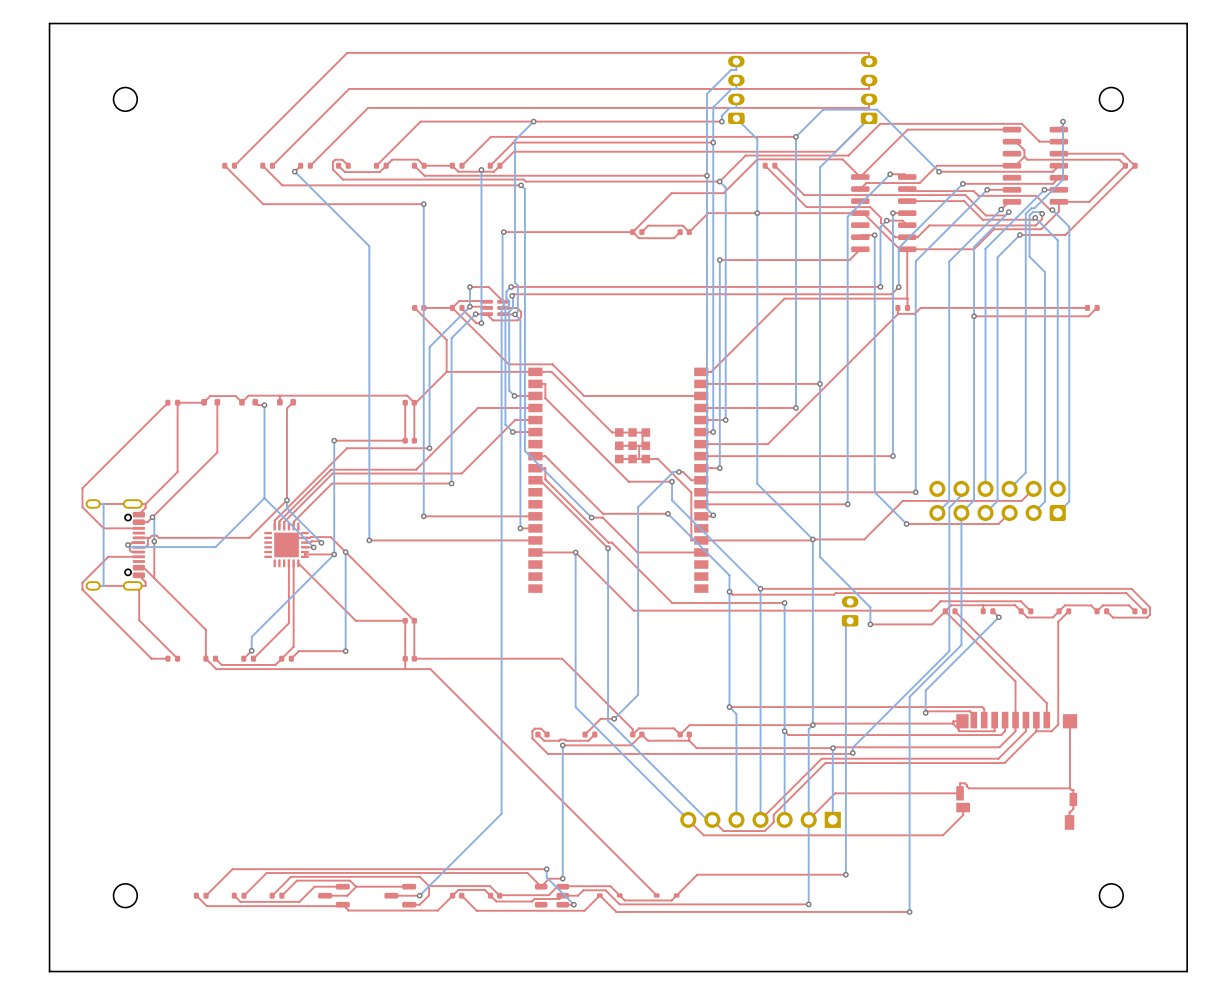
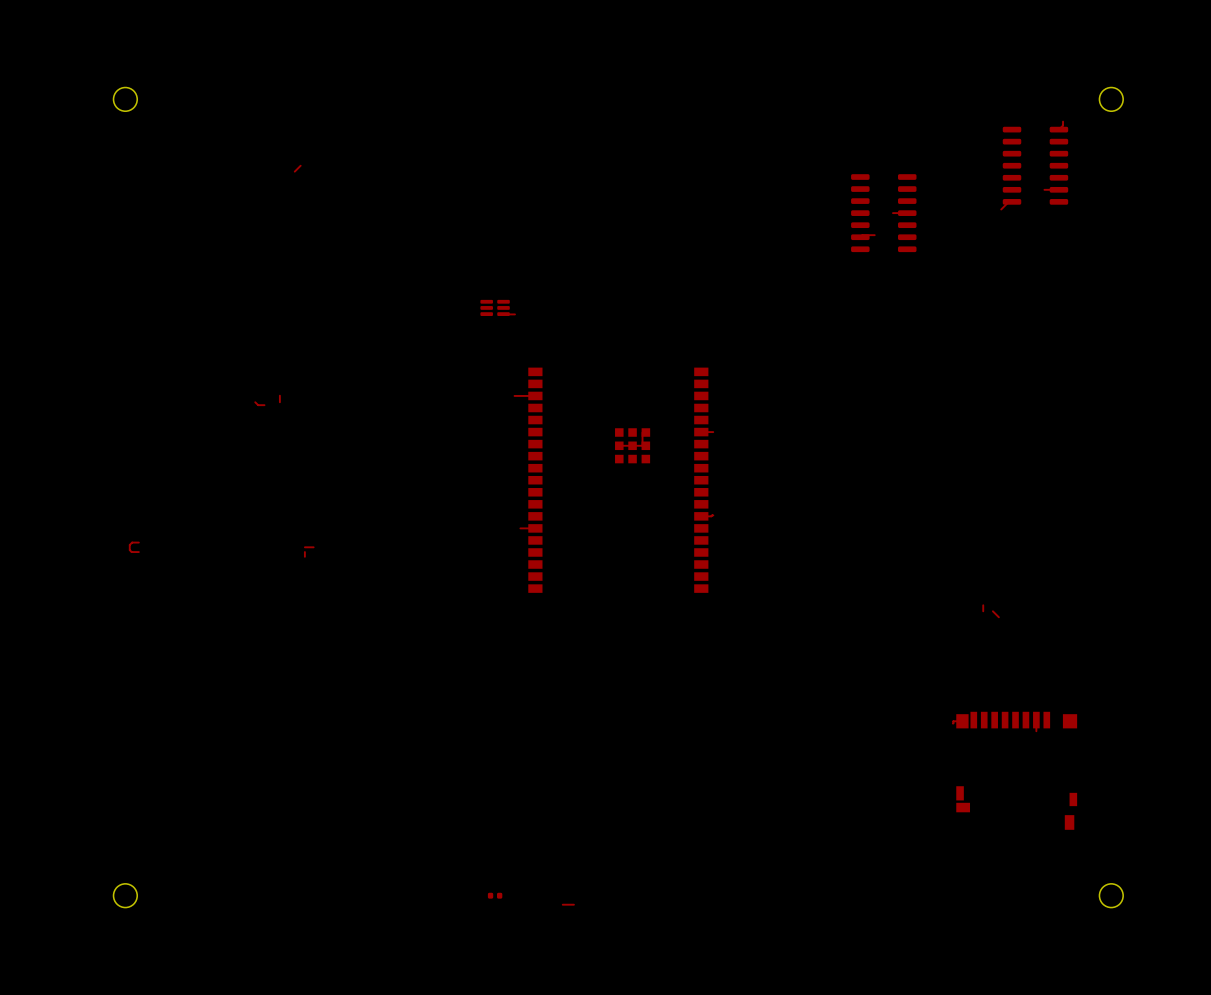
board edge: (1187, 23) (1187, 971) (49, 971) (49, 23) (1187, 23) -> none
bottom track: (736, 61) (736, 70) (731, 70) (706, 94) (706, 509) (713, 515) -> none
top track: (869, 61) (869, 52) (347, 52) (234, 165) -> none
bottom track: (736, 80) (736, 88) (731, 88) (713, 107) (713, 432) -> none
top track: (869, 80) (869, 88) (349, 88) (272, 165) -> none
part: (736, 89) -> none
part: (869, 89) -> none
bottom track: (736, 99) (736, 107) (729, 107) (721, 115) (721, 121) -> none
top track: (869, 99) (869, 107) (368, 107) (310, 165) -> none
bottom track: (736, 118) (757, 139) (757, 483) (812, 539) (812, 725) (808, 729) (808, 904) -> none
top track: (869, 118) (835, 151) (513, 151) (493, 171) (458, 171) (452, 165) (424, 165) (418, 159) (392, 159) (379, 172) (344, 172) (338, 165) -> none
bottom track: (869, 118) (820, 167) (820, 557) (870, 607) (870, 624) -> none
bottom track: (533, 121) (514, 140) (514, 282) (517, 285) (517, 311) (514, 314) (520, 319) (520, 528) -> none
via: (533, 121) -> none
top track: (721, 121) (420, 121) (376, 165) -> none
via: (721, 121) -> none
bottom track: (1063, 121) (1063, 179) (1034, 208) (1031, 208) (1025, 213) (1025, 472) (1009, 488) -> none
via: (1063, 121) -> none
top track: (1012, 129) (907, 129) (860, 177) (842, 159) (757, 159) (723, 193) (671, 193) (632, 232) -> none
top track: (796, 136) (490, 136) (462, 165) -> none
via: (796, 136) -> none
top track: (1012, 141) (1015, 141) (1024, 150) (1024, 156) -> none
top track: (1058, 141) (1039, 141) (1021, 123) (880, 123) (848, 155) (745, 155) (719, 181) (342, 179) (332, 169) (332, 161) (335, 159) (342, 159) (348, 165) -> none
top track: (713, 142) (513, 142) (490, 165) -> none
via: (713, 142) -> none
top track: (1058, 153) (1122, 153) (1134, 165) -> none
top track: (1024, 156) (1027, 159) (1119, 159) (1125, 165) (1089, 201) (1058, 201) (1058, 211) (1041, 229) (994, 229) (974, 249) (899, 249) (863, 213) (708, 213) (689, 232) (682, 225) (648, 225) (641, 232) -> none
top track: (1024, 156) (1015, 165) (936, 165) (919, 183) (866, 183) (860, 189) -> none
top track: (224, 165) (263, 204) (423, 204) -> none
part: (229, 165) -> none
top track: (262, 165) (282, 185) (521, 185) -> none
part: (267, 165) -> none
part: (305, 165) -> none
part: (343, 165) -> none
part: (381, 165) -> none
top track: (414, 165) (424, 175) (706, 175) -> none
part: (419, 165) -> none
part: (457, 165) -> none
part: (495, 165) -> none
top track: (765, 165) (806, 207) (870, 207) (881, 217) (881, 223) (895, 237) (917, 237) (929, 225) (1035, 225) (1042, 219) (1042, 213) -> none
part: (770, 165) -> none
top track: (774, 165) (804, 195) (965, 195) (985, 215) (1005, 215) (1008, 212) -> none
top track: (1058, 165) (1052, 171) (939, 171) -> none
part: (1130, 165) -> none
top track: (1134, 165) (1065, 234) (1019, 234) -> none
bottom track: (481, 169) (481, 323) -> none
via: (481, 169) -> none
bottom track: (294, 171) (369, 246) (369, 540) -> none
via: (294, 171) -> none
bottom track: (939, 171) (877, 109) (823, 109) (796, 136) (796, 408) -> none
via: (939, 171) -> none
top track: (890, 174) (904, 174) (907, 177) -> none
bottom track: (890, 174) (847, 216) (847, 504) -> none
via: (890, 174) -> none
via: (706, 175) -> none
top track: (1058, 177) (1052, 183) (962, 183) -> none
bottom track: (719, 181) (725, 187) (725, 420) -> none
via: (719, 181) -> none
bottom track: (962, 183) (898, 247) (898, 287) -> none
via: (962, 183) -> none
bottom track: (521, 185) (524, 189) (524, 450) (591, 517) -> none
via: (521, 185) -> none
top track: (907, 189) (909, 191) (973, 191) (978, 195) (1036, 195) (1052, 209) -> none
bottom track: (987, 189) (915, 261) (915, 492) -> none
via: (987, 189) -> none
top track: (1012, 189) (987, 189) -> none
bottom track: (1044, 189) (985, 248) (985, 488) -> none
via: (1044, 189) -> none
top track: (907, 201) (964, 201) (982, 219) (1033, 219) (1035, 217) -> none
bottom track: (423, 204) (423, 516) -> none
via: (423, 204) -> none
bottom track: (1001, 209) (949, 261) (949, 501) (937, 512) -> none
via: (1001, 209) -> none
bottom track: (1052, 209) (1069, 226) (1069, 501) (1057, 512) -> none
via: (1052, 209) -> none
bottom track: (1008, 212) (974, 246) (974, 500) (961, 512) (961, 645) (909, 696) (909, 911) -> none
via: (1008, 212) -> none
via: (757, 213) -> none
bottom track: (892, 213) (892, 456) -> none
via: (892, 213) -> none
bottom track: (1042, 213) (1032, 212) (1029, 215) (1029, 256) (1044, 272) (1044, 501) (1033, 512) -> none
via: (1042, 213) -> none
bottom track: (1035, 217) (1057, 240) (1057, 488) -> none
via: (1035, 217) -> none
top track: (886, 220) (902, 220) (907, 225) -> none
bottom track: (886, 220) (880, 226) (880, 286) -> none
via: (886, 220) -> none
bottom track: (503, 232) (503, 305) (501, 307) (501, 813) (419, 895) -> none
via: (503, 232) -> none
top track: (632, 232) (503, 232) -> none
part: (637, 232) -> none
top track: (680, 232) (674, 238) (638, 238) (632, 232) -> none
part: (684, 232) -> none
bottom track: (1019, 234) (997, 257) (997, 500) (985, 512) -> none
via: (1019, 234) -> none
bottom track: (874, 235) (874, 492) (906, 524) -> none
via: (874, 235) -> none
top track: (860, 249) (849, 260) (719, 260) -> none
top track: (907, 249) (907, 298) -> none
bottom track: (719, 260) (719, 468) -> none
via: (719, 260) -> none
bottom track: (511, 286) (506, 291) (509, 305) (505, 309) (505, 424) (512, 432) -> none
via: (511, 286) -> none
top track: (880, 286) (511, 286) -> none
via: (880, 286) -> none
top track: (469, 287) (488, 287) (503, 301) -> none
bottom track: (469, 287) (469, 306) (429, 347) (429, 448) -> none
via: (469, 287) -> none
top track: (898, 287) (891, 294) (513, 294) (512, 295) -> none
via: (898, 287) -> none
bottom track: (512, 295) (513, 307) (509, 311) (509, 390) (514, 395) -> none
via: (512, 295) -> none
top track: (907, 298) (784, 298) (711, 371) (701, 371) -> none
top track: (907, 298) (907, 307) -> none
top track: (486, 301) (459, 301) (452, 307) -> none
top track: (469, 306) (486, 307) -> none
via: (469, 306) -> none
top track: (414, 307) (446, 339) (446, 371) -> none
part: (419, 307) -> none
top track: (452, 307) (423, 307) -> none
top track: (452, 307) (508, 364) (552, 364) (584, 395) (701, 395) -> none
part: (457, 307) -> none
top track: (462, 307) (476, 323) (481, 323) -> none
top track: (503, 307) (517, 307) (521, 311) (521, 317) (517, 320) (492, 320) (486, 314) (475, 314) -> none
top track: (897, 307) (897, 314) (767, 444) (701, 444) -> none
part: (902, 307) -> none
top track: (1087, 307) (920, 307) (914, 313) (897, 313) -> none
part: (1092, 307) -> none
top track: (1097, 307) (1088, 316) (974, 316) -> none
bottom track: (475, 314) (451, 338) (451, 483) -> none
via: (475, 314) -> none
via: (514, 314) -> none
via: (974, 316) -> none
via: (481, 323) -> none
top track: (446, 371) (551, 371) (612, 432) (645, 432) -> none
top track: (446, 371) (414, 402) -> none
top track: (535, 383) (545, 383) (545, 398) (628, 481) (672, 481) -> none
top track: (820, 383) (701, 383) -> none
via: (820, 383) -> none
via: (514, 395) -> none
top track: (167, 402) (82, 488) (82, 507) (103, 528) (138, 528) -> none
part: (172, 402) -> none
part: (210, 402) -> none
top track: (217, 402) (217, 452) (147, 522) (138, 522) -> none
part: (248, 402) -> none
part: (286, 402) -> none
top track: (293, 402) (286, 408) (286, 500) (249, 537) (158, 537) (156, 535) (138, 537) -> none
top track: (405, 402) (405, 440) (334, 440) -> none
part: (409, 402) -> none
top track: (414, 402) (414, 440) -> none
top track: (414, 402) (407, 395) (248, 395) (241, 402) (235, 396) (210, 396) (203, 402) (177, 402) (177, 471) (145, 503) -> none
bottom track: (264, 405) (264, 498) (215, 547) (130, 547) (127, 544) -> none
via: (264, 405) -> none
top track: (535, 408) (477, 408) (416, 469) (331, 469) (279, 521) (279, 526) -> none
top track: (796, 408) (701, 408) -> none
via: (796, 408) -> none
top track: (535, 420) (515, 420) (461, 473) (332, 473) (284, 522) (284, 526) -> none
top track: (725, 420) (701, 420) -> none
via: (725, 420) -> none
via: (512, 432) -> none
top track: (535, 432) (512, 432) -> none
via: (713, 432) -> none
bottom track: (334, 440) (334, 554) (251, 636) (251, 650) -> none
via: (334, 440) -> none
part: (409, 440) -> none
top track: (639, 445) (639, 459) -> none
top track: (429, 448) (347, 448) (274, 520) (274, 526) -> none
via: (429, 448) -> none
top track: (535, 456) (545, 456) (603, 513) (667, 513) -> none
top track: (892, 456) (701, 456) -> none
via: (892, 456) -> none
top track: (619, 459) (657, 459) (691, 492) (691, 540) (864, 539) (902, 500) (1021, 500) (1033, 488) -> none
top track: (535, 468) (545, 468) (545, 479) (672, 602) (784, 602) -> none
top track: (719, 468) (701, 468) -> none
via: (719, 468) -> none
top track: (678, 471) (683, 471) (691, 480) (701, 480) -> none
bottom track: (678, 471) (673, 471) (638, 507) (638, 694) (614, 718) -> none
via: (678, 471) -> none
top track: (535, 480) (539, 480) (608, 548) -> none
bottom track: (672, 481) (672, 500) (760, 588) (760, 819) -> none
via: (672, 481) -> none
top track: (451, 483) (332, 483) (293, 521) (293, 526) -> none
via: (451, 483) -> none
bottom track: (961, 488) (961, 495) (949, 507) (949, 651) (852, 747) (852, 752) -> none
top track: (915, 492) (701, 492) -> none
via: (915, 492) -> none
bottom track: (264, 498) (313, 547) -> none
bottom track: (286, 500) (286, 508) (321, 542) -> none
via: (286, 500) -> none
part: (997, 500) -> none
bottom track: (93, 503) (103, 503) (103, 585) (93, 585) -> none
top track: (145, 503) (145, 507) (138, 514) -> none
top track: (145, 503) (93, 503) -> none
top track: (847, 504) (701, 504) -> none
via: (847, 504) -> none
top track: (1009, 512) (998, 524) (906, 524) -> none
bottom track: (667, 513) (729, 575) (729, 707) (736, 714) (736, 819) -> none
via: (667, 513) -> none
via: (713, 515) -> none
via: (423, 516) -> none
top track: (535, 516) (423, 516) -> none
bottom track: (152, 517) (154, 519) (154, 541) -> none
via: (152, 517) -> none
top track: (591, 517) (602, 517) (637, 552) (701, 552) -> none
via: (591, 517) -> none
via: (906, 524) -> none
via: (520, 528) -> none
top track: (147, 537) (147, 544) (145, 547) (138, 547) -> none
via: (812, 539) -> none
via: (369, 540) -> none
top track: (535, 540) (369, 540) -> none
top track: (154, 541) (154, 578) -> none
via: (154, 541) -> none
top track: (304, 542) (319, 541) (321, 542) -> none
via: (321, 542) -> none
part: (115, 544) -> none
via: (127, 544) -> none
top track: (286, 544) (293, 537) (330, 537) (414, 620) (414, 658) (562, 658) (632, 729) (632, 734) (638, 728) (674, 728) (680, 734) (689, 725) (812, 725) (814, 723) (953, 723) (959, 731) (994, 731) (994, 720) -> none
part: (286, 544) -> none
via: (313, 547) -> none
bottom track: (608, 548) (608, 720) (707, 819) (712, 819) -> none
via: (608, 548) -> none
bottom track: (345, 552) (345, 651) -> none
via: (345, 552) -> none
top track: (535, 552) (575, 552) (633, 610) (931, 610) (940, 601) (1020, 601) (1030, 611) -> none
bottom track: (575, 552) (575, 707) (688, 819) -> none
via: (575, 552) -> none
top track: (334, 554) (304, 554) -> none
via: (334, 554) -> none
top track: (138, 556) (108, 556) (82, 582) (82, 589) (151, 658) (167, 658) -> none
top track: (288, 563) (288, 623) (253, 658) -> none
top track: (293, 563) (293, 646) (275, 664) (221, 664) (215, 658) -> none
top track: (298, 563) (355, 620) (405, 620) (405, 669) -> none
top track: (138, 567) (143, 567) (205, 629) (205, 658) (216, 669) (430, 669) (656, 895) -> none
top track: (138, 575) (145, 582) (145, 585) (93, 585) -> none
top track: (139, 585) (139, 620) (177, 658) -> none
top track: (760, 588) (1131, 588) (1150, 607) (1150, 614) (1147, 617) (1112, 617) (1106, 611) -> none
via: (760, 588) -> none
top track: (729, 591) (732, 594) (1126, 593) (1144, 611) -> none
via: (729, 591) -> none
bottom track: (784, 602) (784, 819) -> none
via: (784, 602) -> none
part: (850, 611) -> none
top track: (945, 611) (1015, 681) (1015, 731) (999, 747) (696, 748) (689, 740) -> none
part: (950, 611) -> none
top track: (954, 611) (1046, 703) (1046, 720) -> none
part: (988, 611) -> none
part: (1025, 611) -> none
part: (1063, 611) -> none
top track: (1068, 611) (1058, 621) (1058, 724) (1051, 731) (1036, 731) (1004, 763) (825, 763) (773, 814) (773, 822) (764, 831) (723, 831) (712, 819) -> none
part: (1101, 611) -> none
top track: (1134, 611) (1128, 605) (1102, 605) (1096, 611) (1091, 605) (1064, 605) (1052, 617) (1027, 617) (1015, 605) (951, 605) (932, 624) (870, 624) -> none
part: (1139, 611) -> none
bottom track: (998, 617) (925, 690) (925, 712) -> none
via: (998, 617) -> none
part: (409, 620) -> none
bottom track: (850, 620) (845, 625) (845, 874) -> none
via: (870, 624) -> none
top track: (251, 650) (243, 658) -> none
via: (251, 650) -> none
top track: (345, 651) (298, 651) (291, 658) -> none
via: (345, 651) -> none
part: (172, 658) -> none
part: (210, 658) -> none
part: (248, 658) -> none
part: (286, 658) -> none
part: (409, 658) -> none
top track: (729, 707) (982, 707) (984, 708) (984, 720) -> none
via: (729, 707) -> none
top track: (925, 712) (927, 711) (969, 711) (973, 715) (973, 720) -> none
via: (925, 712) -> none
top track: (614, 718) (600, 718) (585, 734) -> none
via: (614, 718) -> none
top track: (1005, 720) (1005, 731) (1001, 735) (788, 735) (784, 731) -> none
top track: (1025, 720) (1025, 731) (998, 758) (821, 758) (760, 819) -> none
top track: (1070, 721) (1070, 788) -> none
via: (812, 725) -> none
via: (784, 731) -> none
part: (542, 734) -> none
top track: (547, 734) (541, 728) (534, 728) (532, 731) (532, 738) (547, 753) (852, 752) -> none
part: (589, 734) -> none
top track: (594, 734) (588, 740) (544, 740) (537, 734) -> none
part: (637, 734) -> none
part: (684, 734) -> none
top track: (689, 734) (689, 740) -> none
top track: (689, 740) (648, 740) (641, 734) (631, 745) (562, 745) -> none
bottom track: (562, 745) (562, 878) -> none
via: (562, 745) -> none
bottom track: (832, 748) (832, 819) -> none
via: (832, 748) -> none
via: (852, 752) -> none
top track: (1070, 788) (968, 788) (965, 783) (960, 783) (960, 793) (835, 793) (808, 819) -> none
top track: (1070, 788) (1073, 789) (1073, 808) (1069, 812) (1069, 822) -> none
top track: (963, 807) (963, 815) (942, 835) (703, 835) (688, 819) -> none
part: (760, 819) -> none
top track: (546, 869) (232, 869) (206, 895) -> none
bottom track: (546, 869) (546, 877) (573, 904) -> none
via: (546, 869) -> none
top track: (845, 874) (697, 874) (671, 900) (624, 900) (610, 886) (557, 886) (548, 895) (499, 895) (490, 886) (429, 886) -> none
via: (845, 874) -> none
top track: (562, 878) (549, 878) (541, 886) (527, 873) (266, 873) (243, 895) -> none
via: (562, 878) -> none
top track: (342, 886) (314, 886) (299, 901) (240, 901) (234, 895) -> none
top track: (356, 886) (349, 880) (296, 880) (281, 895) -> none
top track: (409, 886) (356, 886) (347, 895) (325, 895) -> none
top track: (429, 886) (419, 876) (291, 876) (272, 895) -> none
top track: (429, 886) (429, 895) (419, 904) (409, 904) -> none
top track: (196, 895) (206, 906) (342, 904) (348, 910) (437, 910) (458, 889) (484, 889) (496, 901) (559, 899) (562, 895) (577, 895) (583, 890) (605, 890) (619, 904) (808, 904) -> none
part: (201, 895) -> none
part: (239, 895) -> none
part: (277, 895) -> none
part: (333, 895) -> none
part: (400, 895) -> none
top track: (419, 895) (391, 895) -> none
via: (419, 895) -> none
part: (457, 895) -> none
top track: (461, 895) (476, 910) (584, 910) (599, 895) (616, 911) (909, 911) -> none
part: (551, 895) -> none
part: (609, 895) -> none
part: (666, 895) -> none
via: (573, 904) -> none
via: (808, 904) -> none
via: (909, 911) -> none

